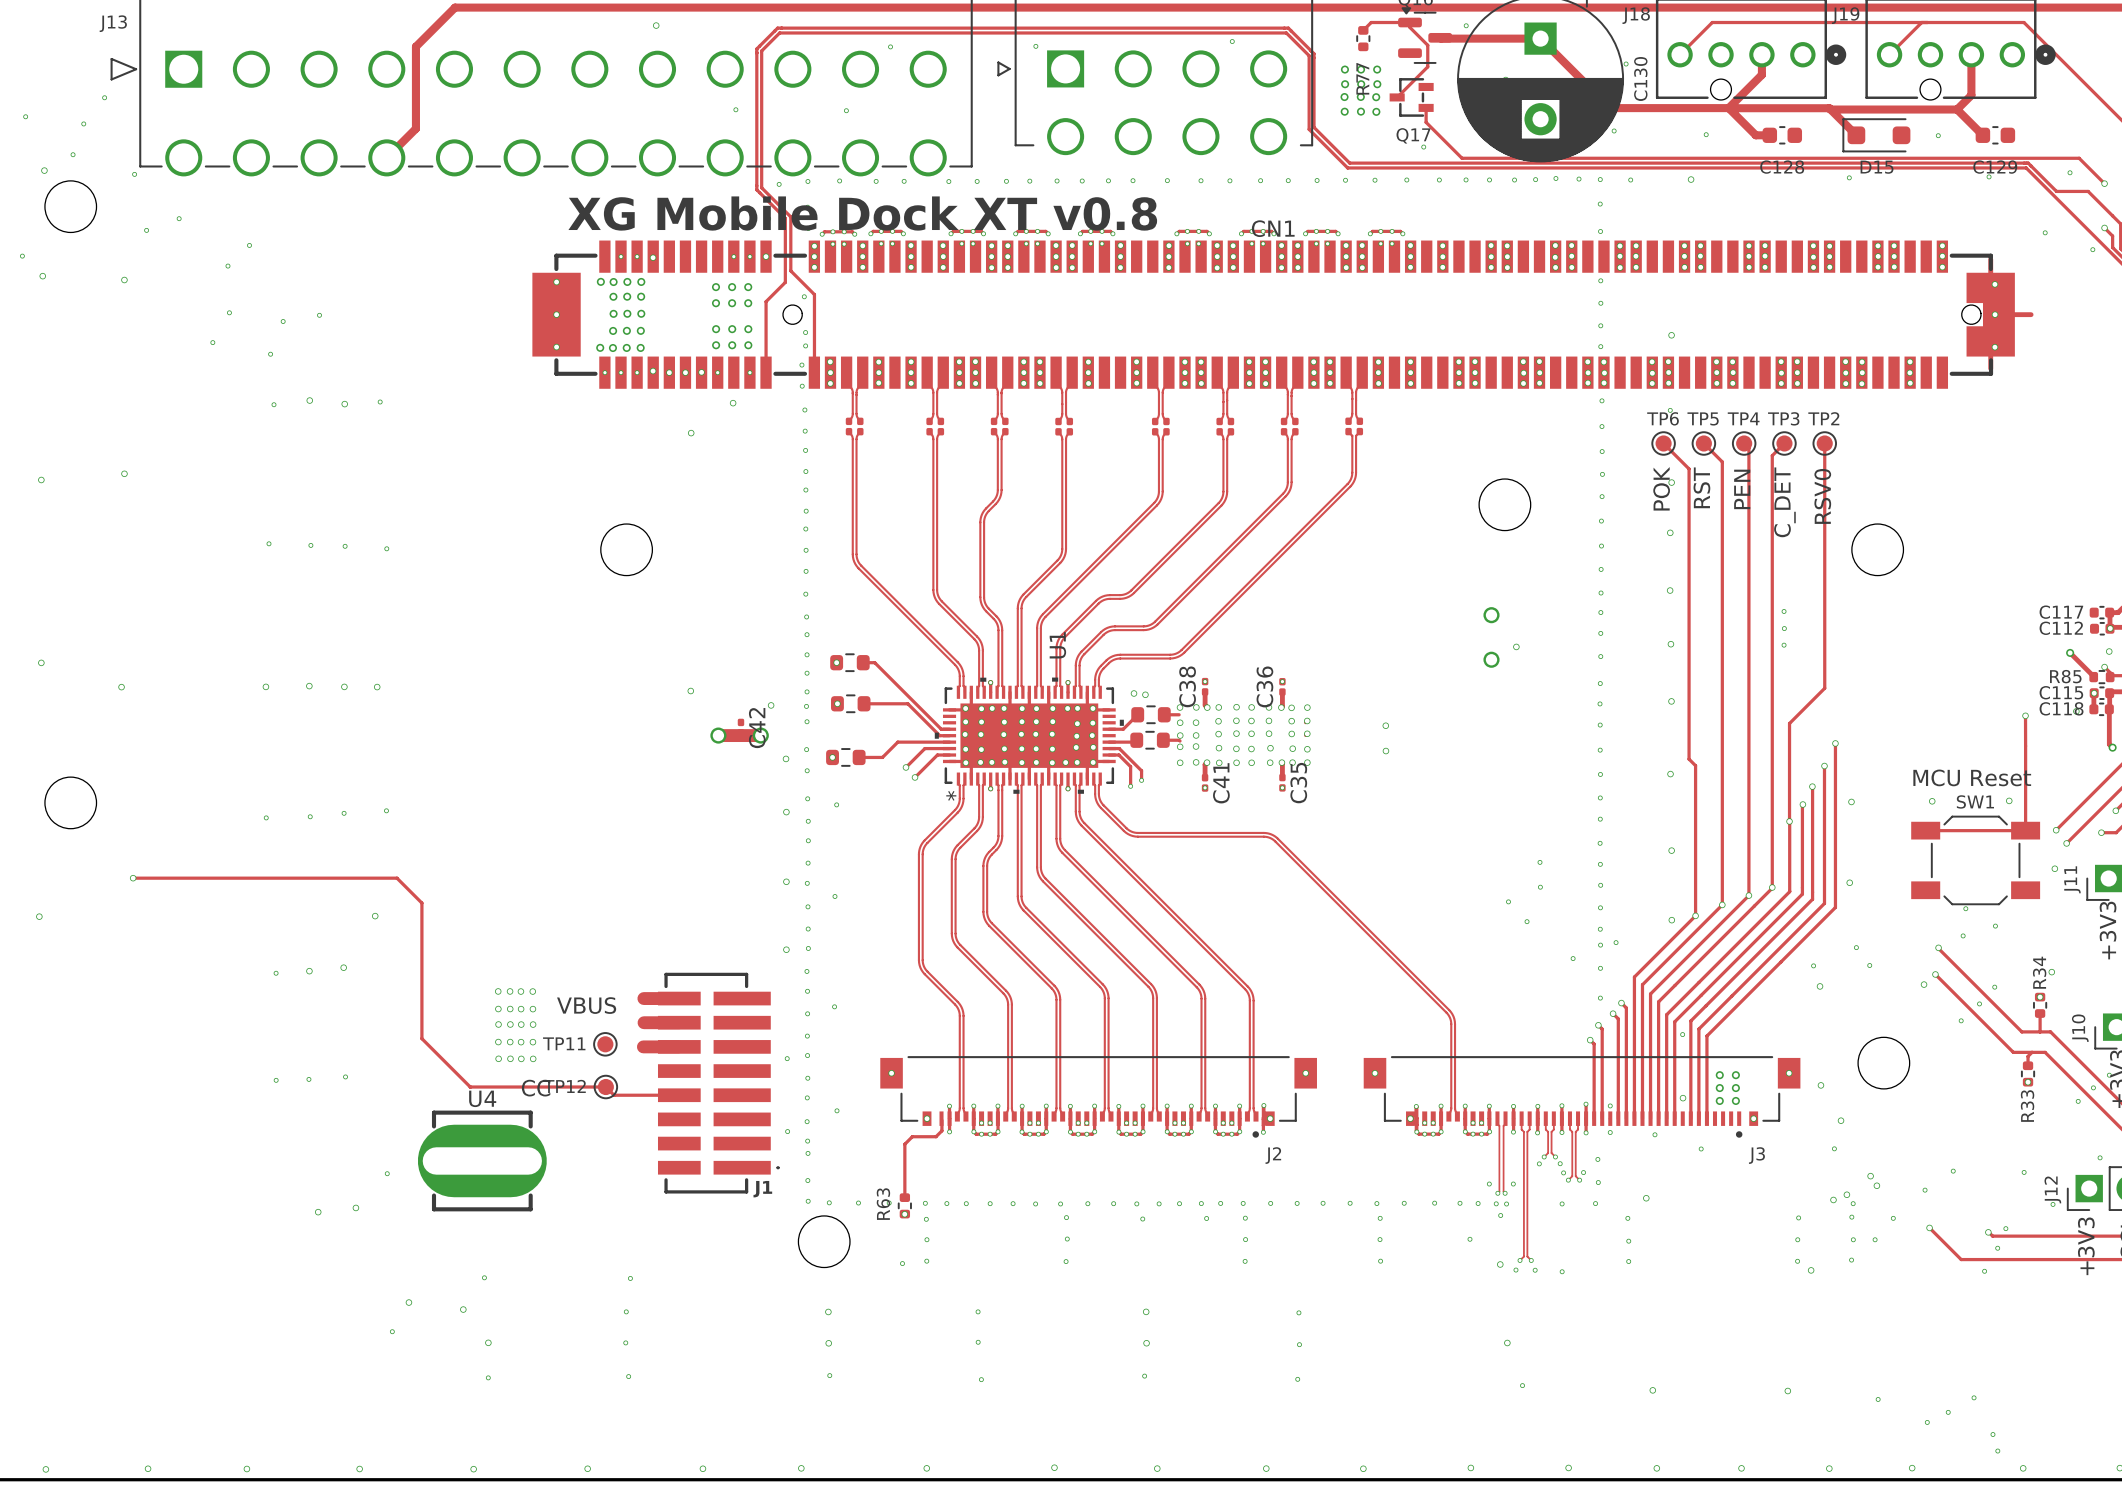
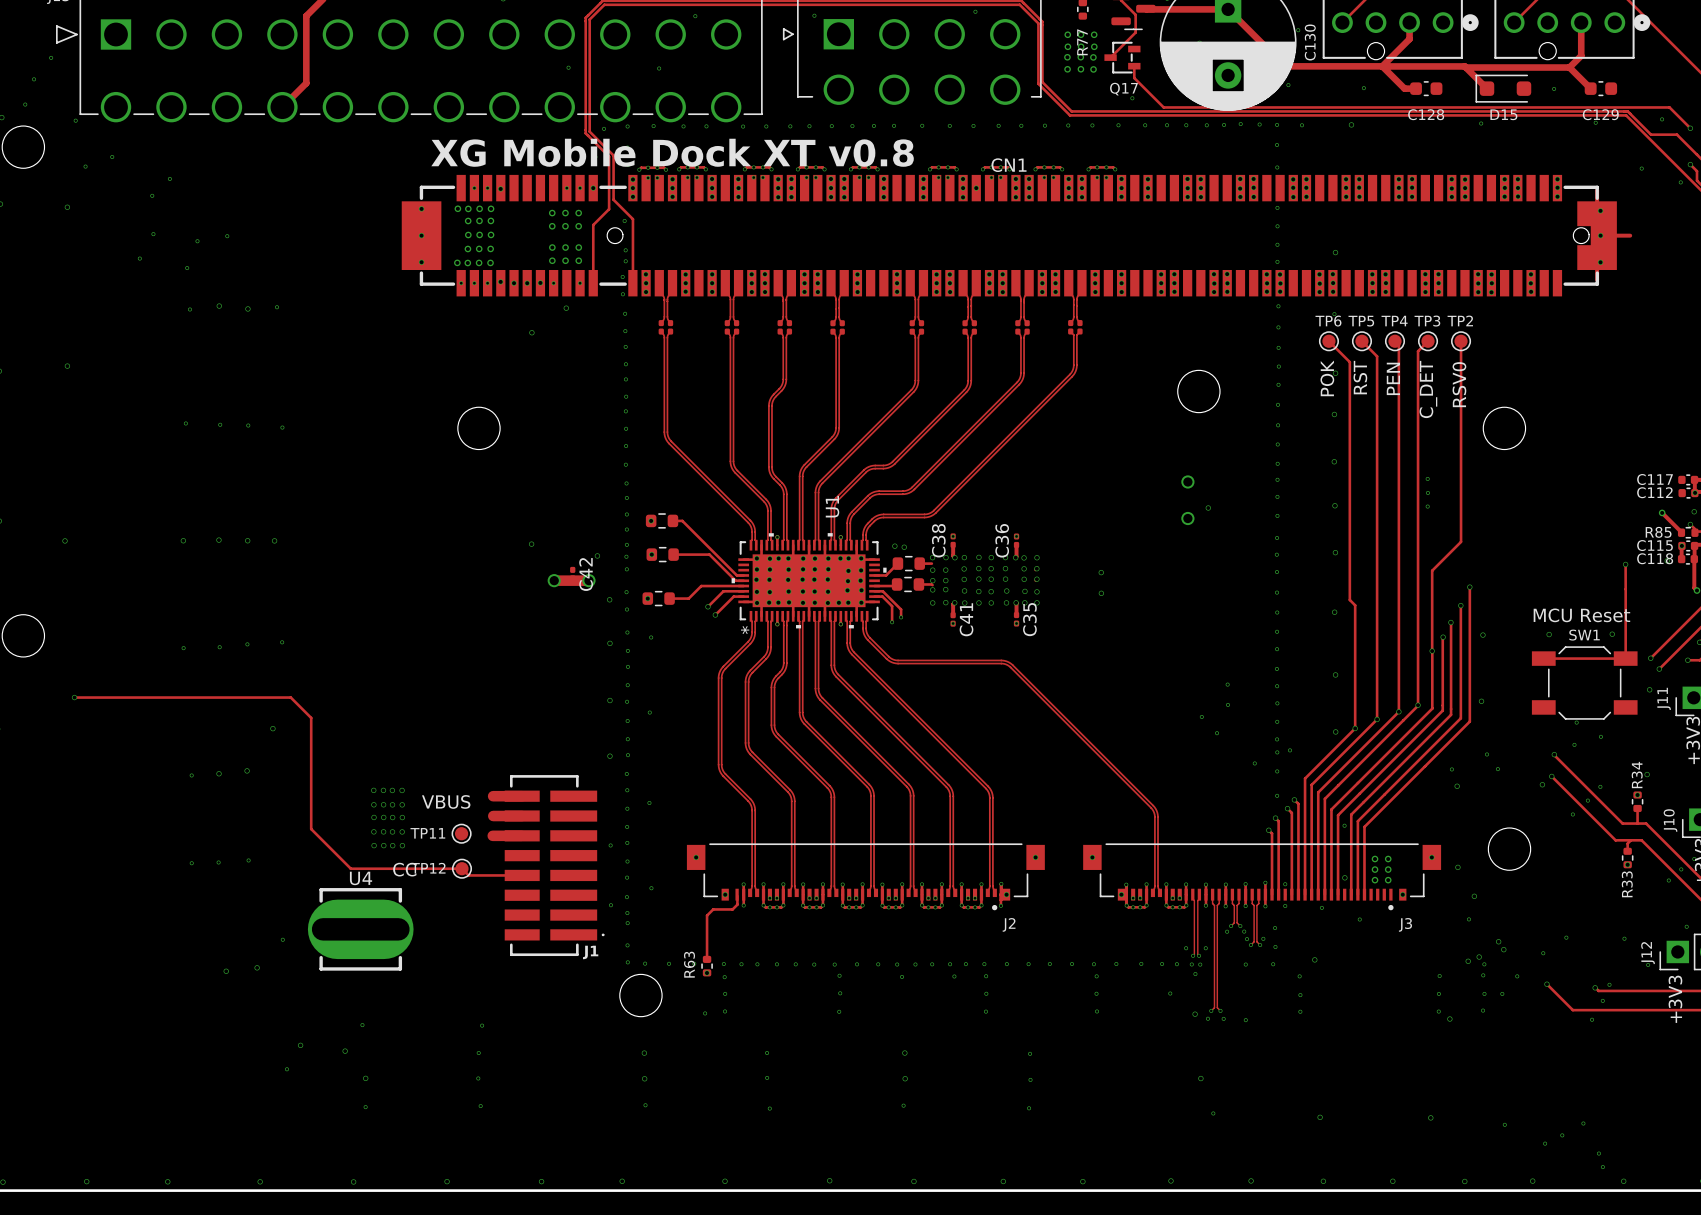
via: (1233, 245) -> none
via: (1233, 267) -> none

